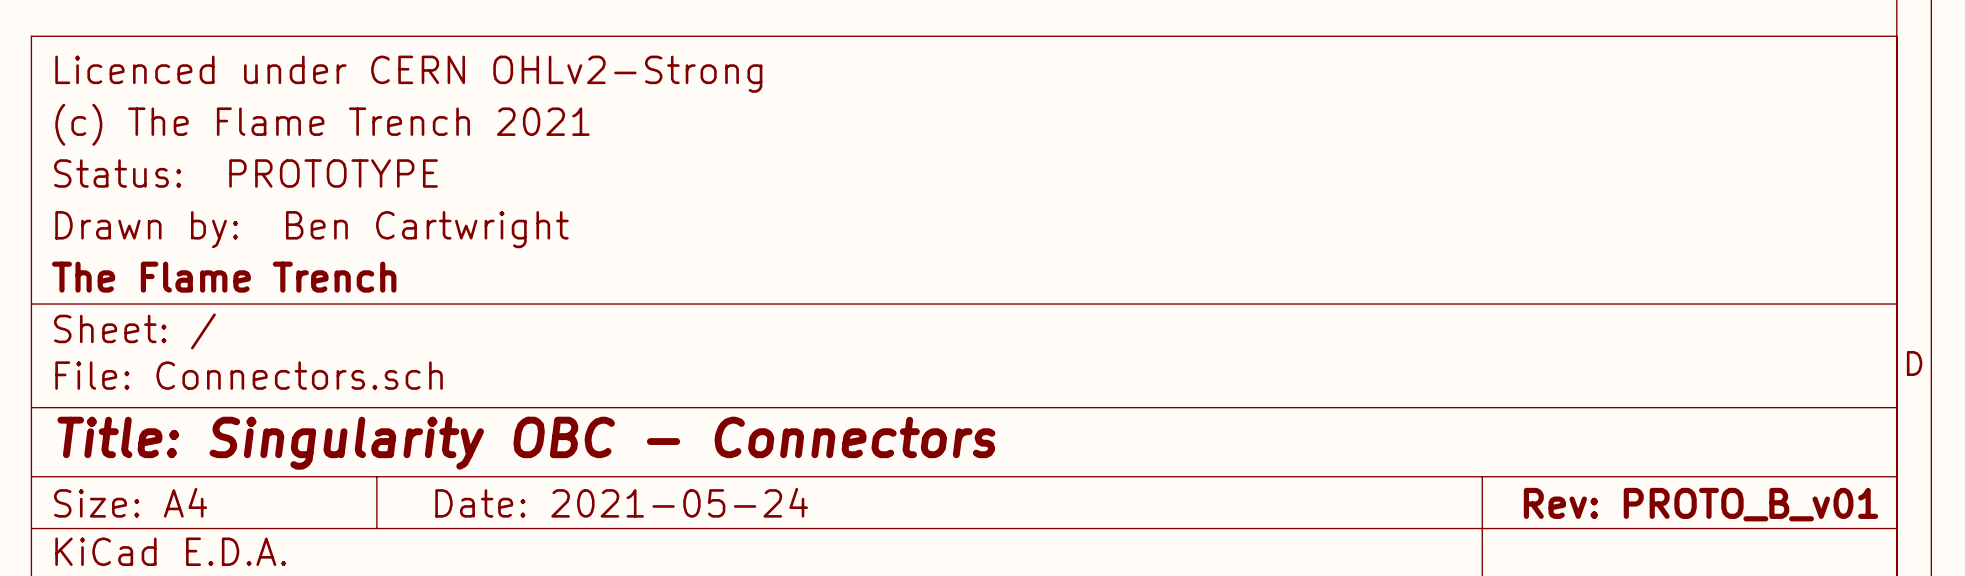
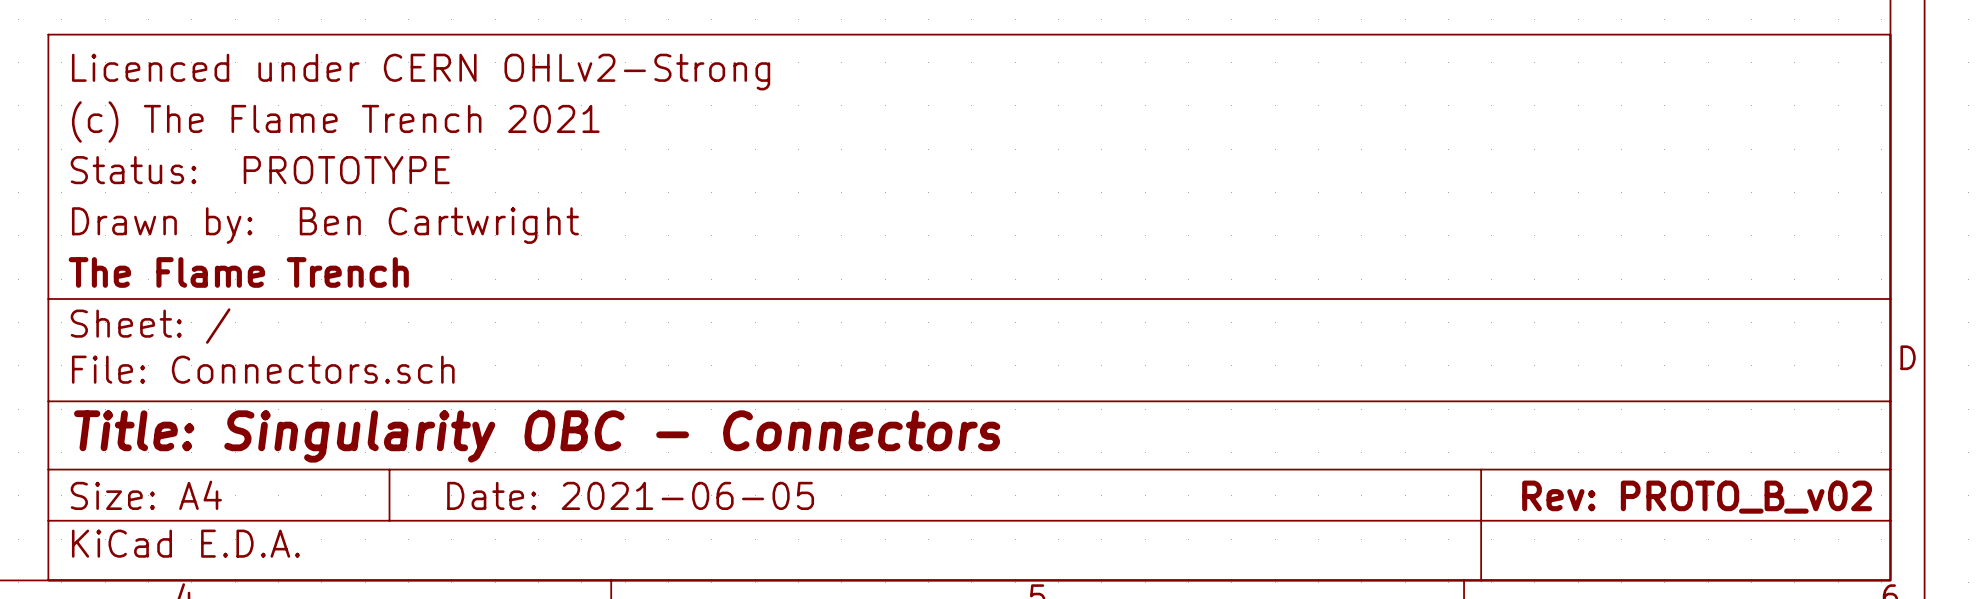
title block: Date: 2021-05-24 (621, 502) -> Date: 2021-06-05 (630, 495)
title block: Rev: PROTO_B_v01 (1700, 504) -> Rev: PROTO_B_v02 (1697, 497)

